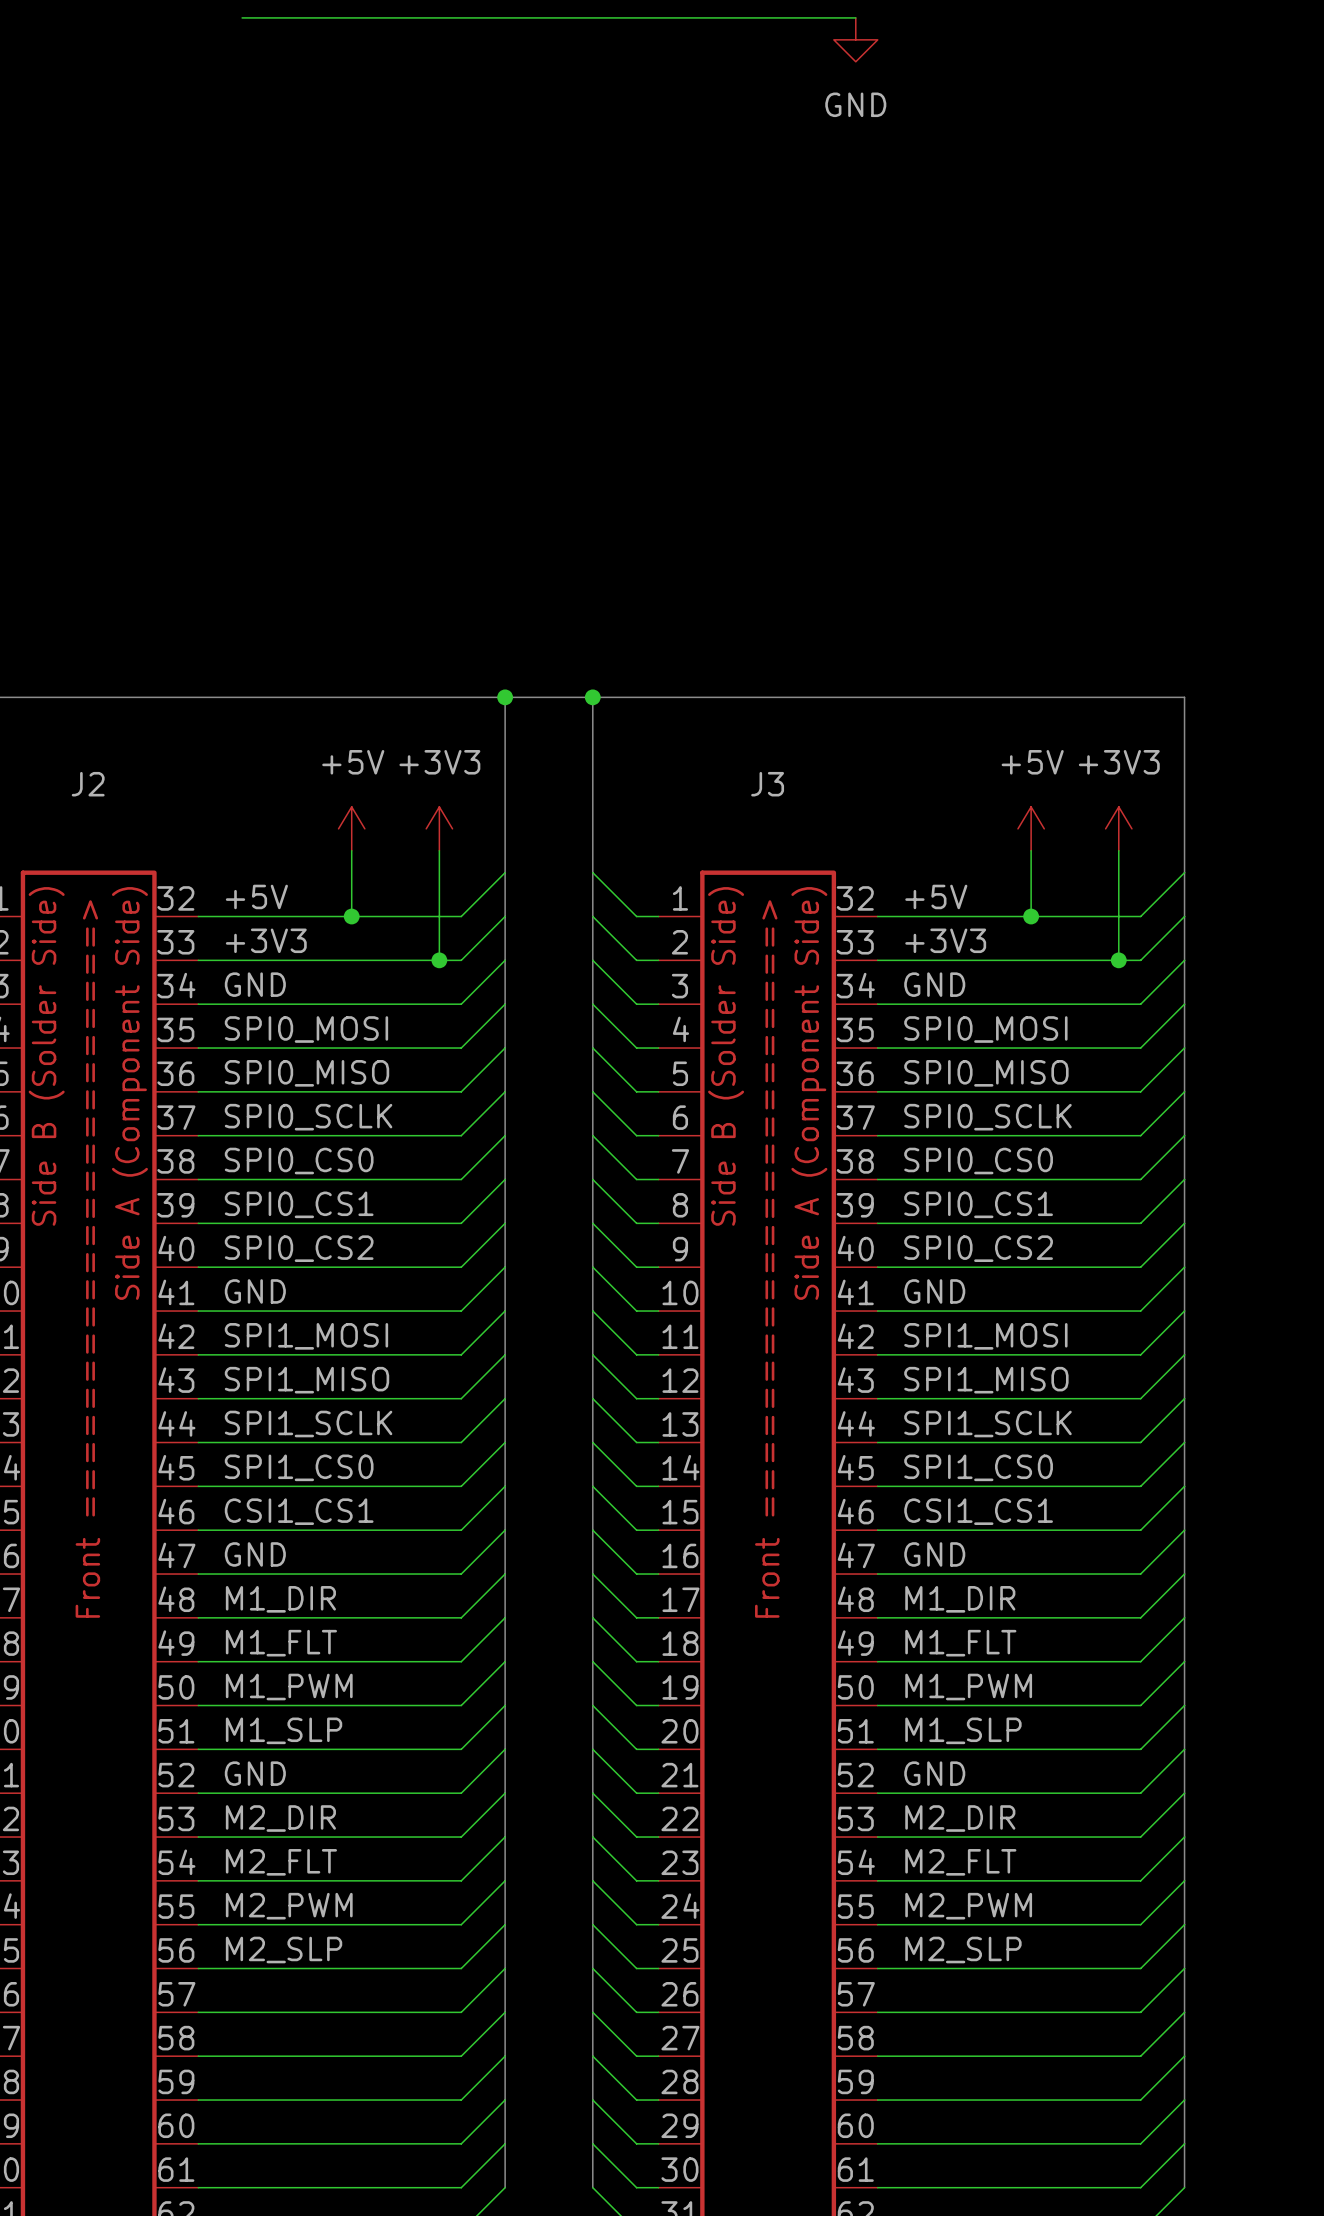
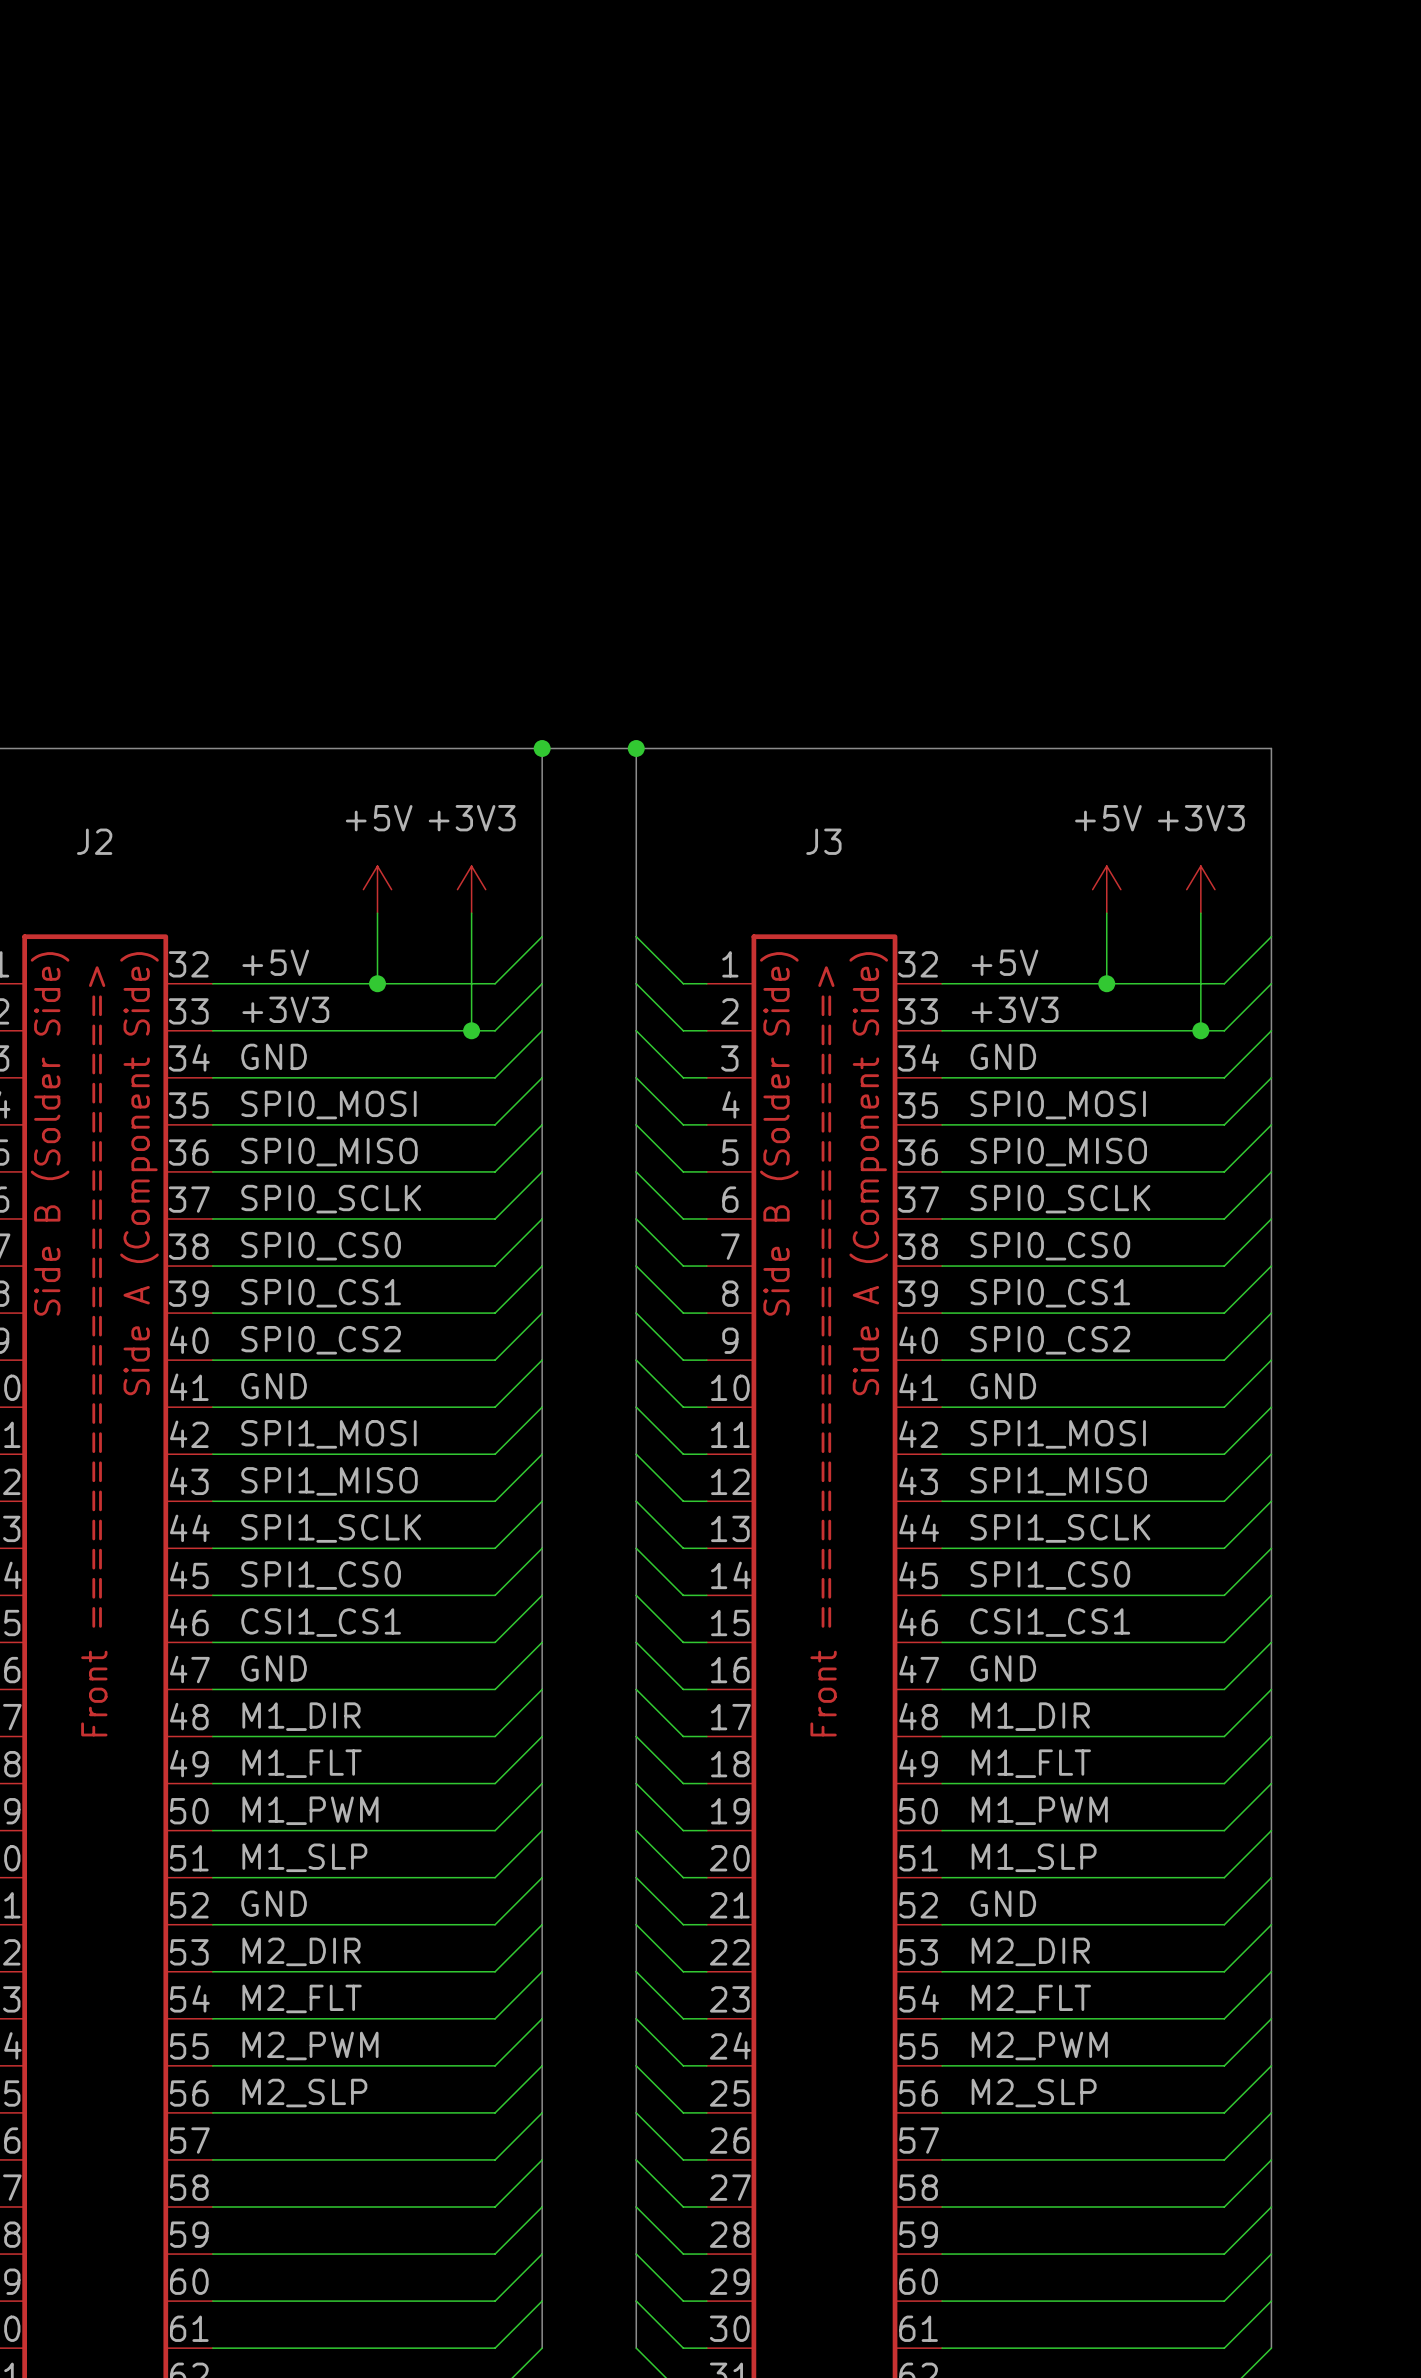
wire: (242, 17) (855, 17) -> none
power symbol: GND (855, 39) -> none

